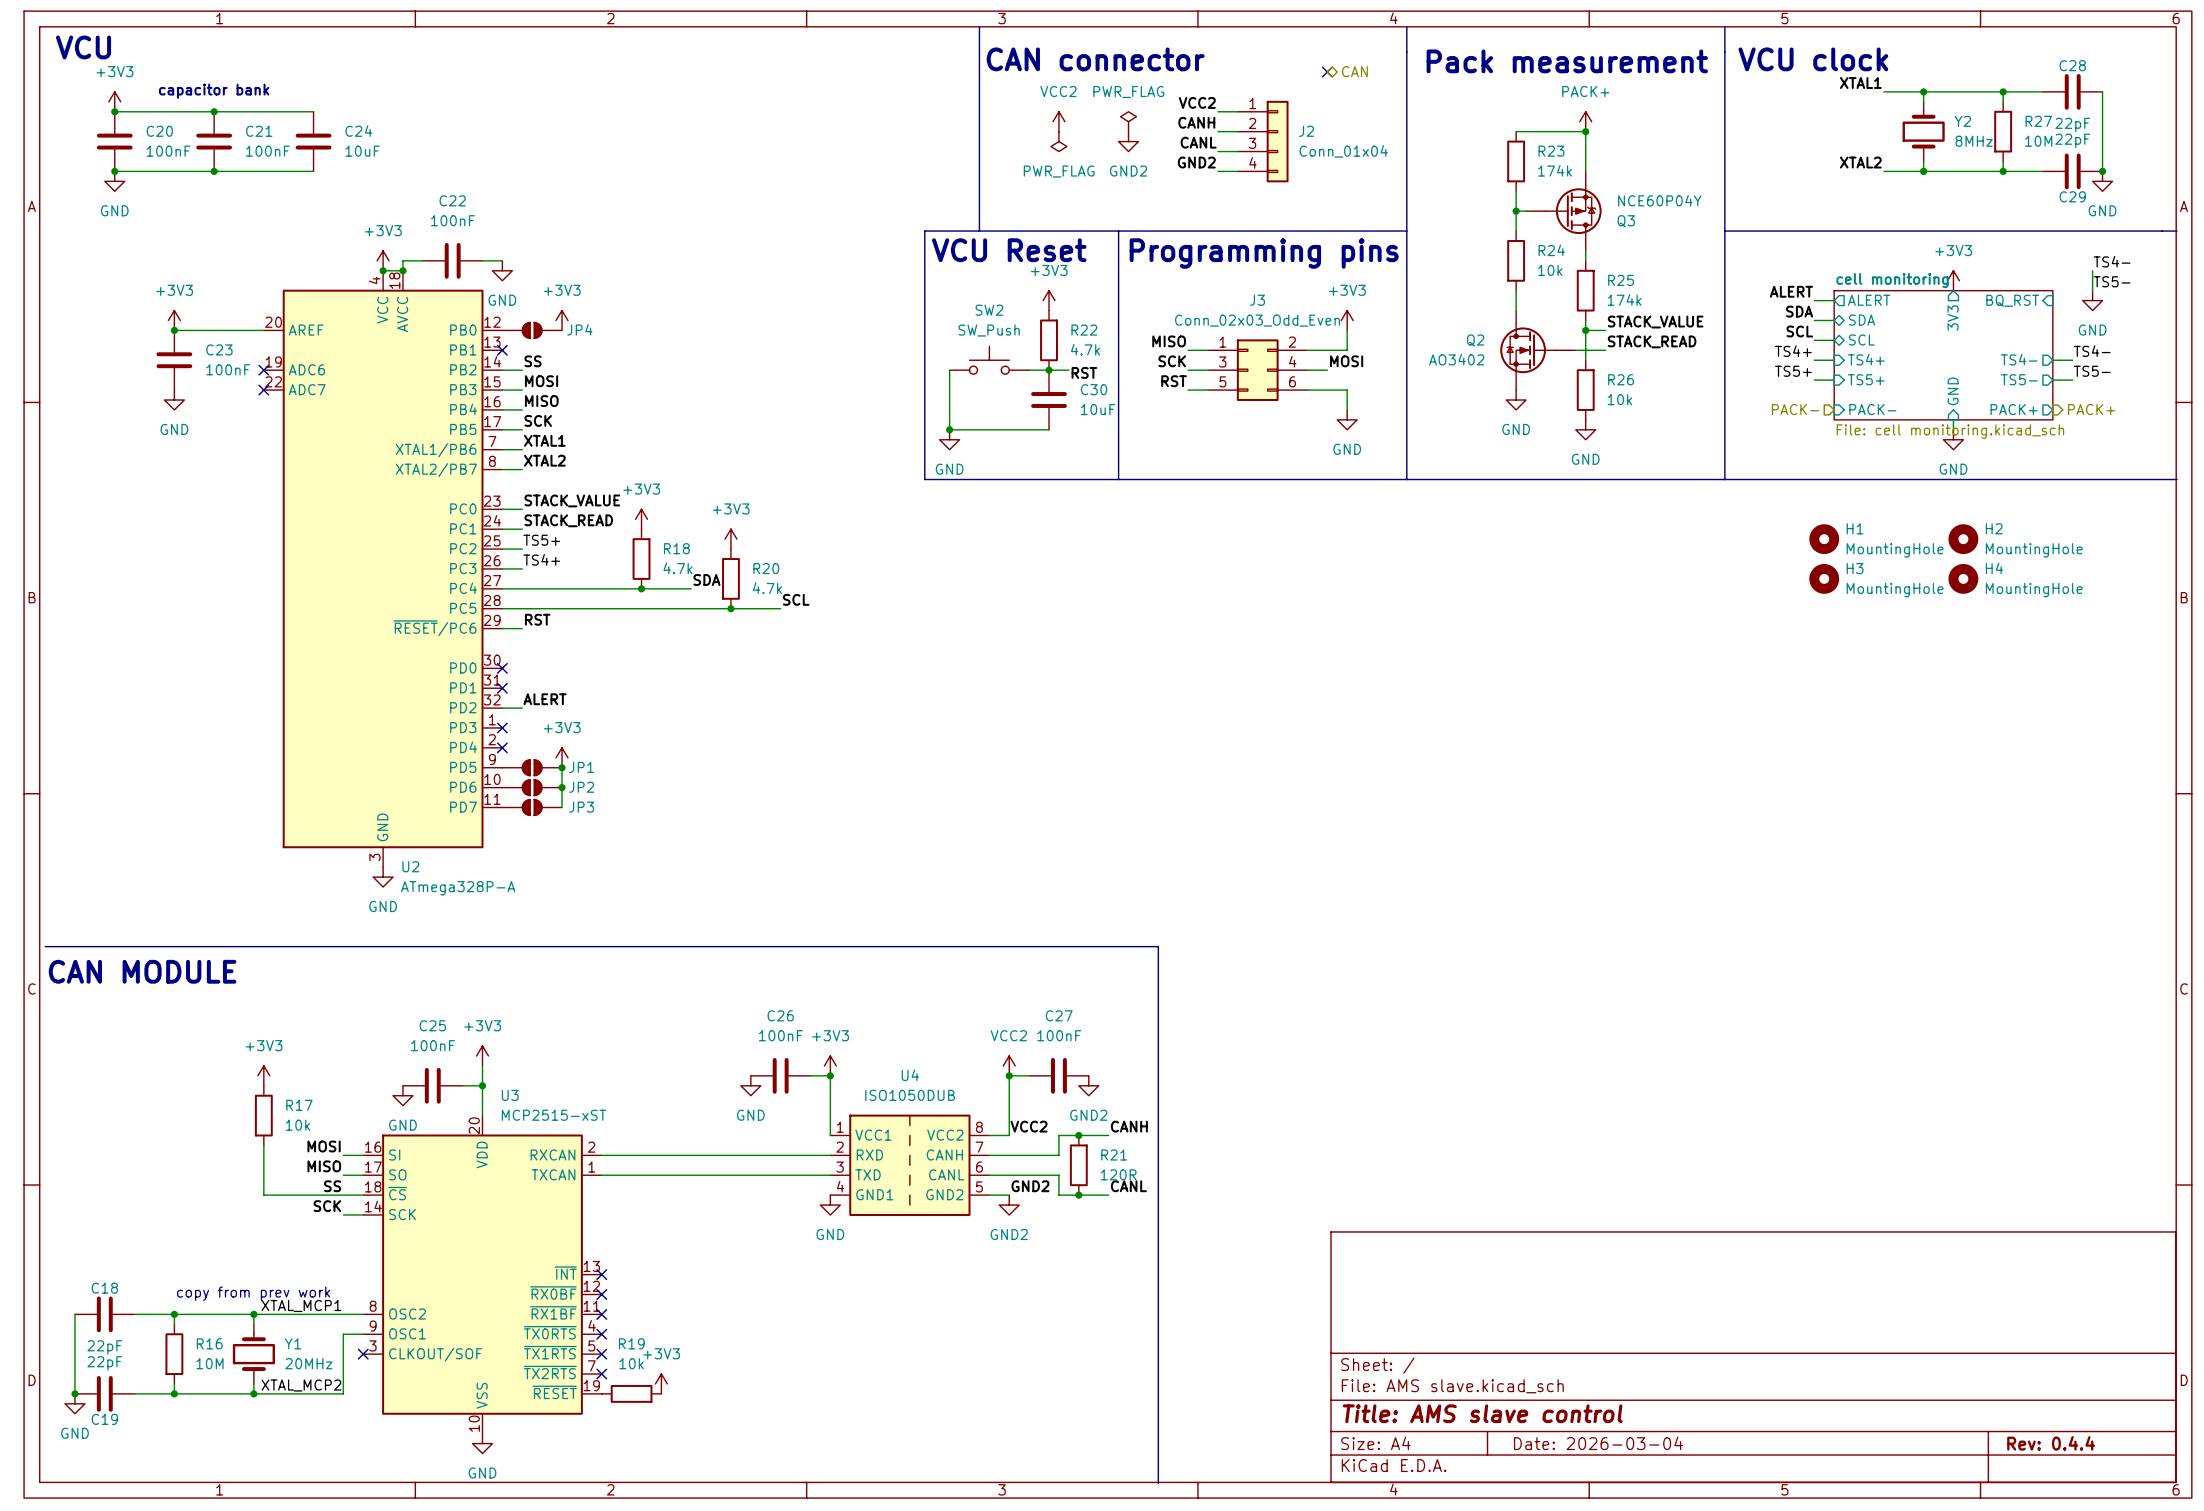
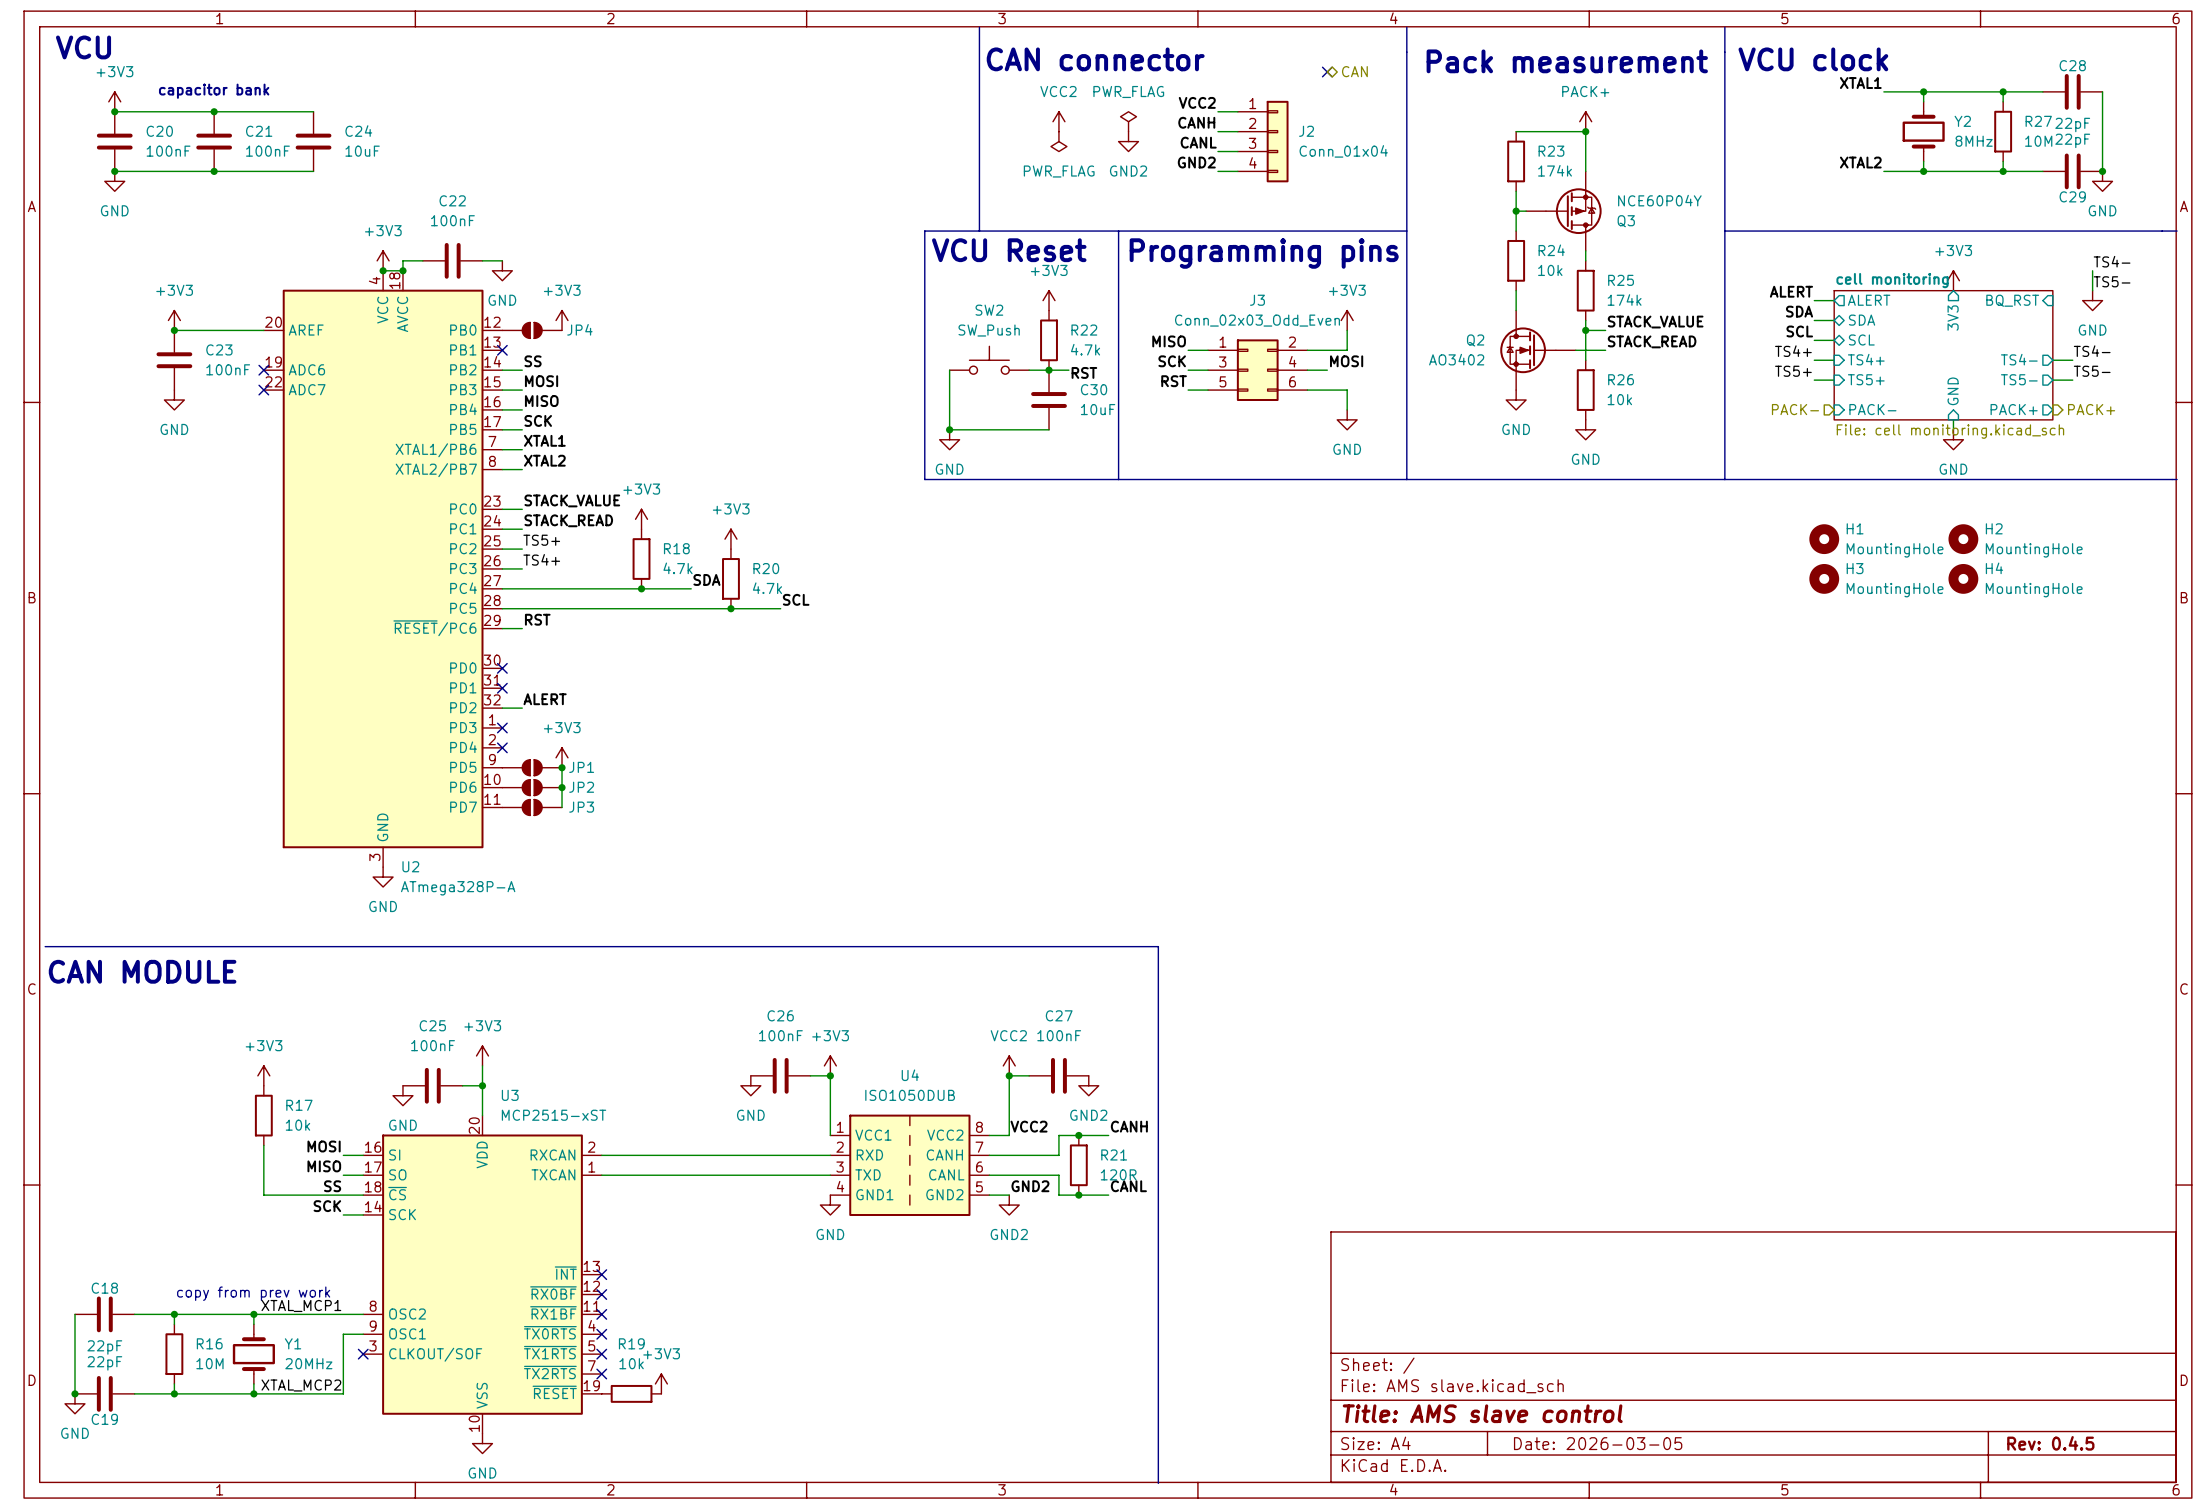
title block: Date: 2026-03-04 (1598, 1443) -> Date: 2026-03-05 (1598, 1443)
title block: Rev: 0.4.4 (2051, 1443) -> Rev: 0.4.5 (2050, 1443)

